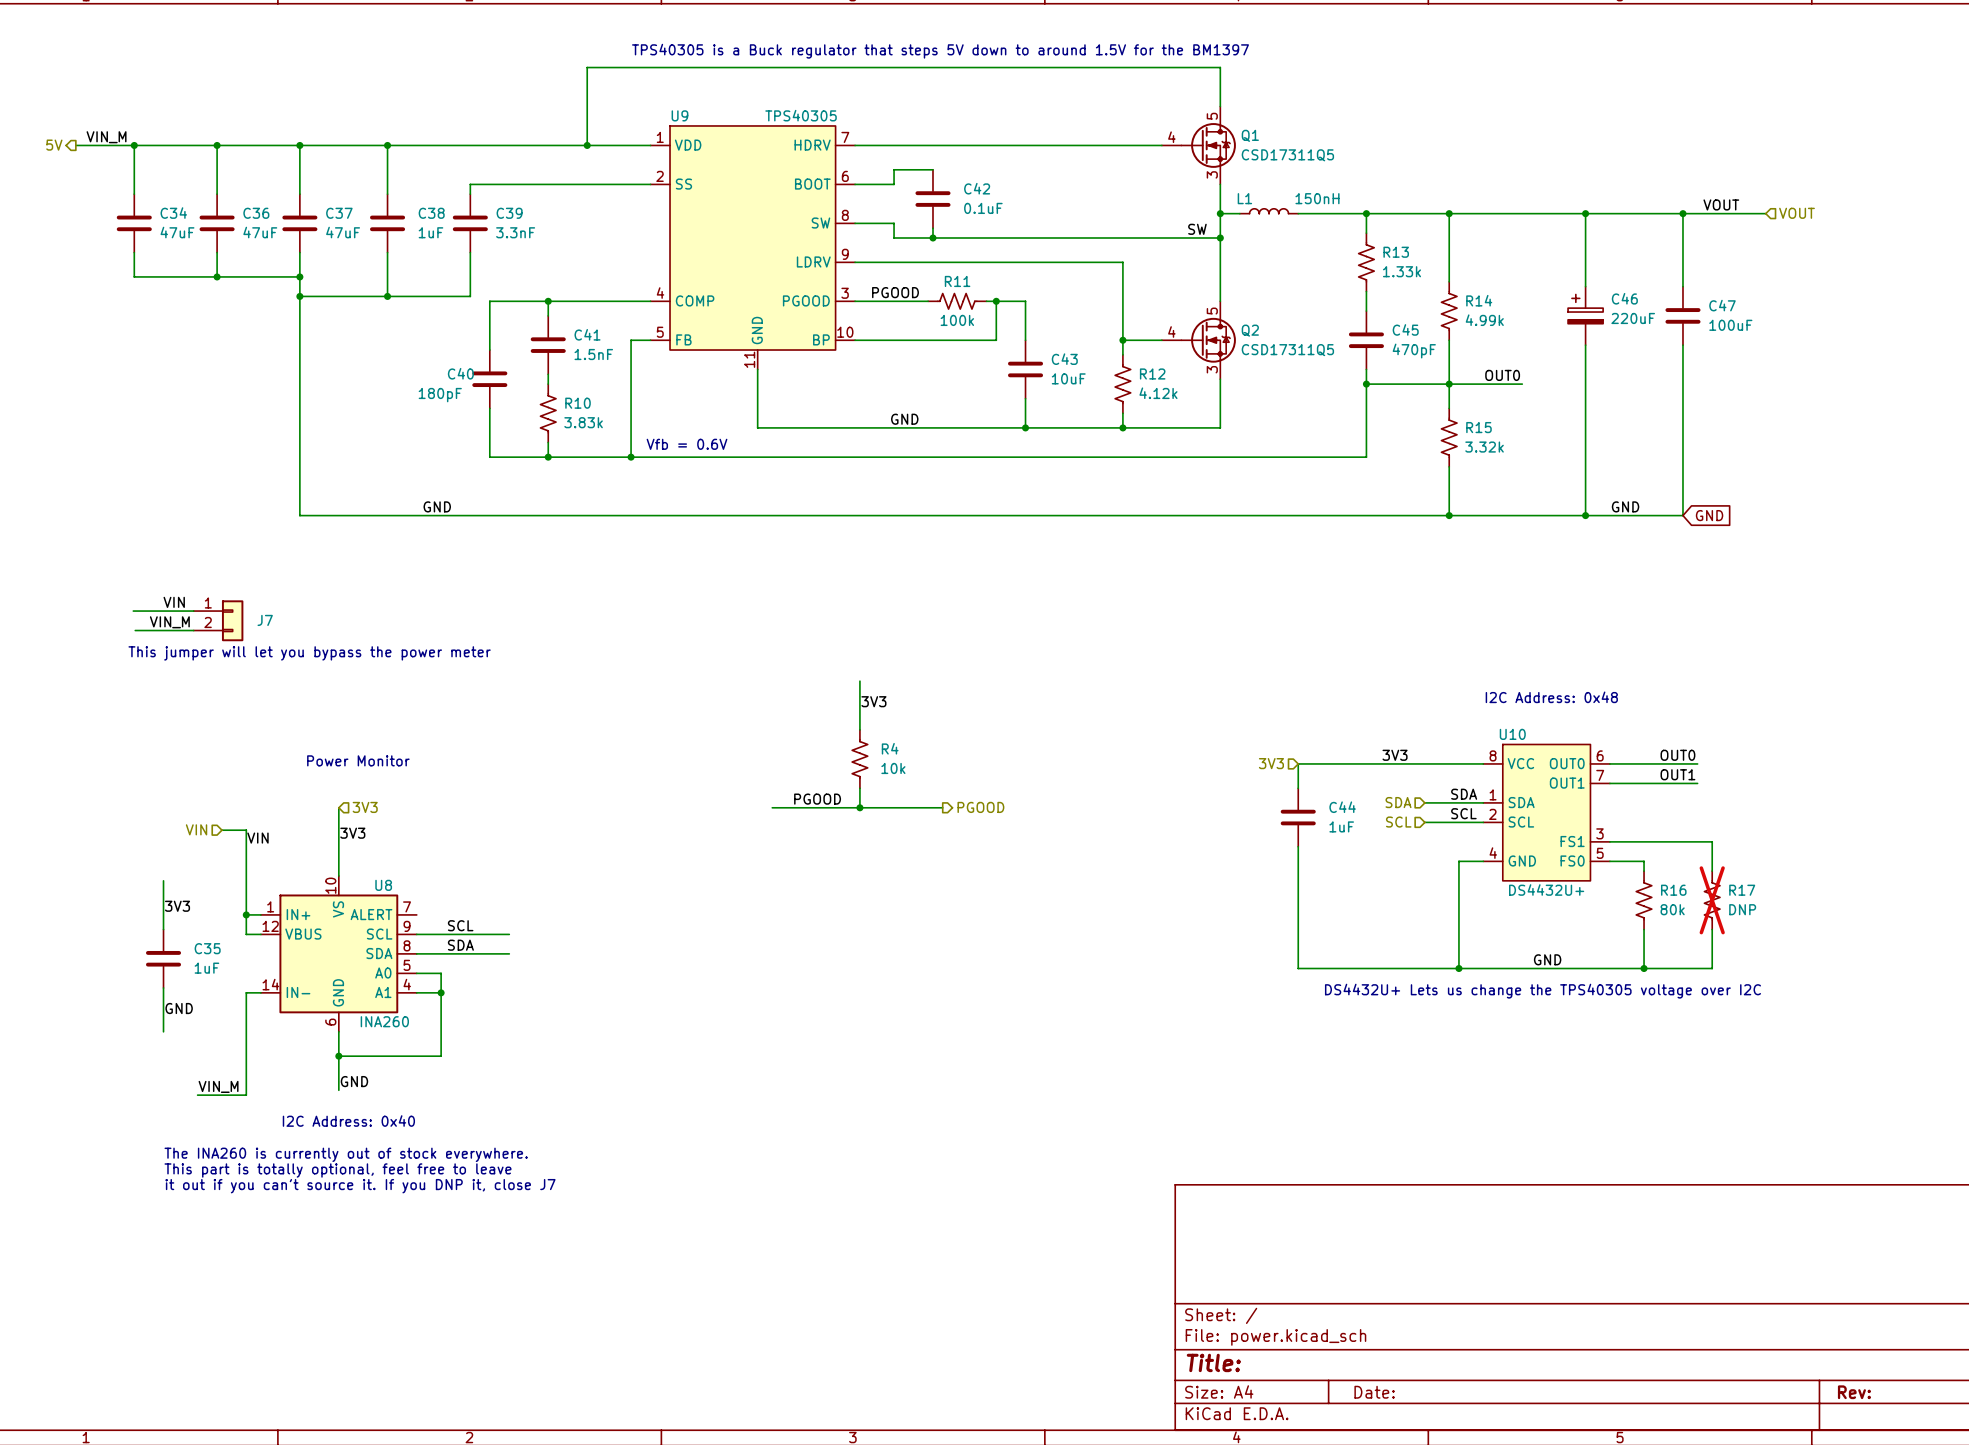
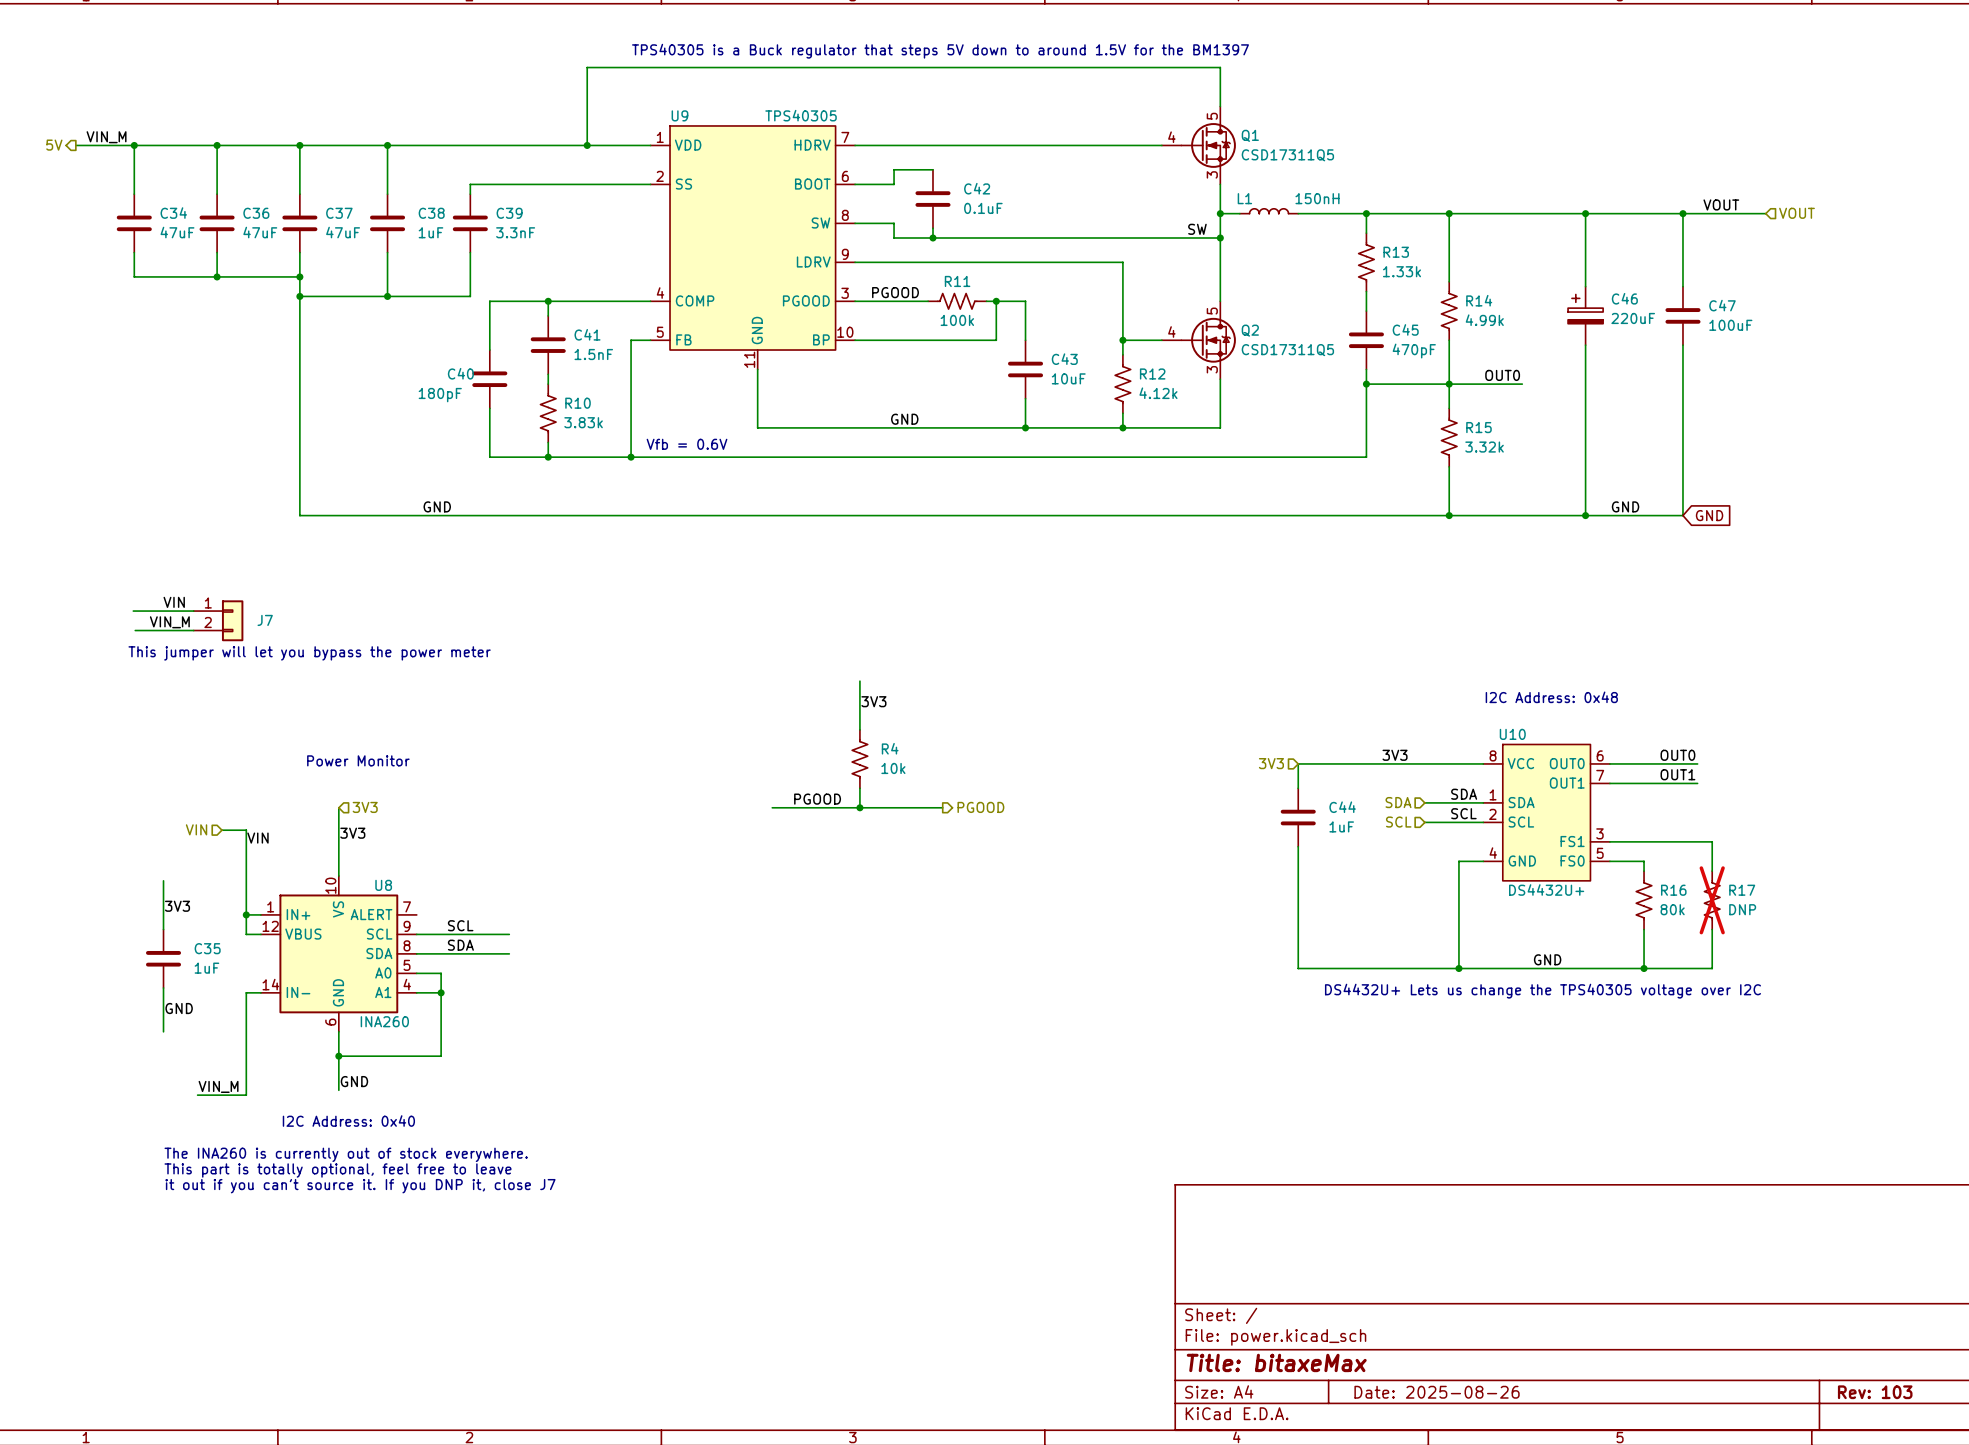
title block: Title: (1213, 1362) -> Title: bitaxeMax (1276, 1362)
title block: Date: (1374, 1392) -> Date: 2025-08-26 (1437, 1392)
title block: Rev: (1854, 1392) -> Rev: 103 (1875, 1392)

